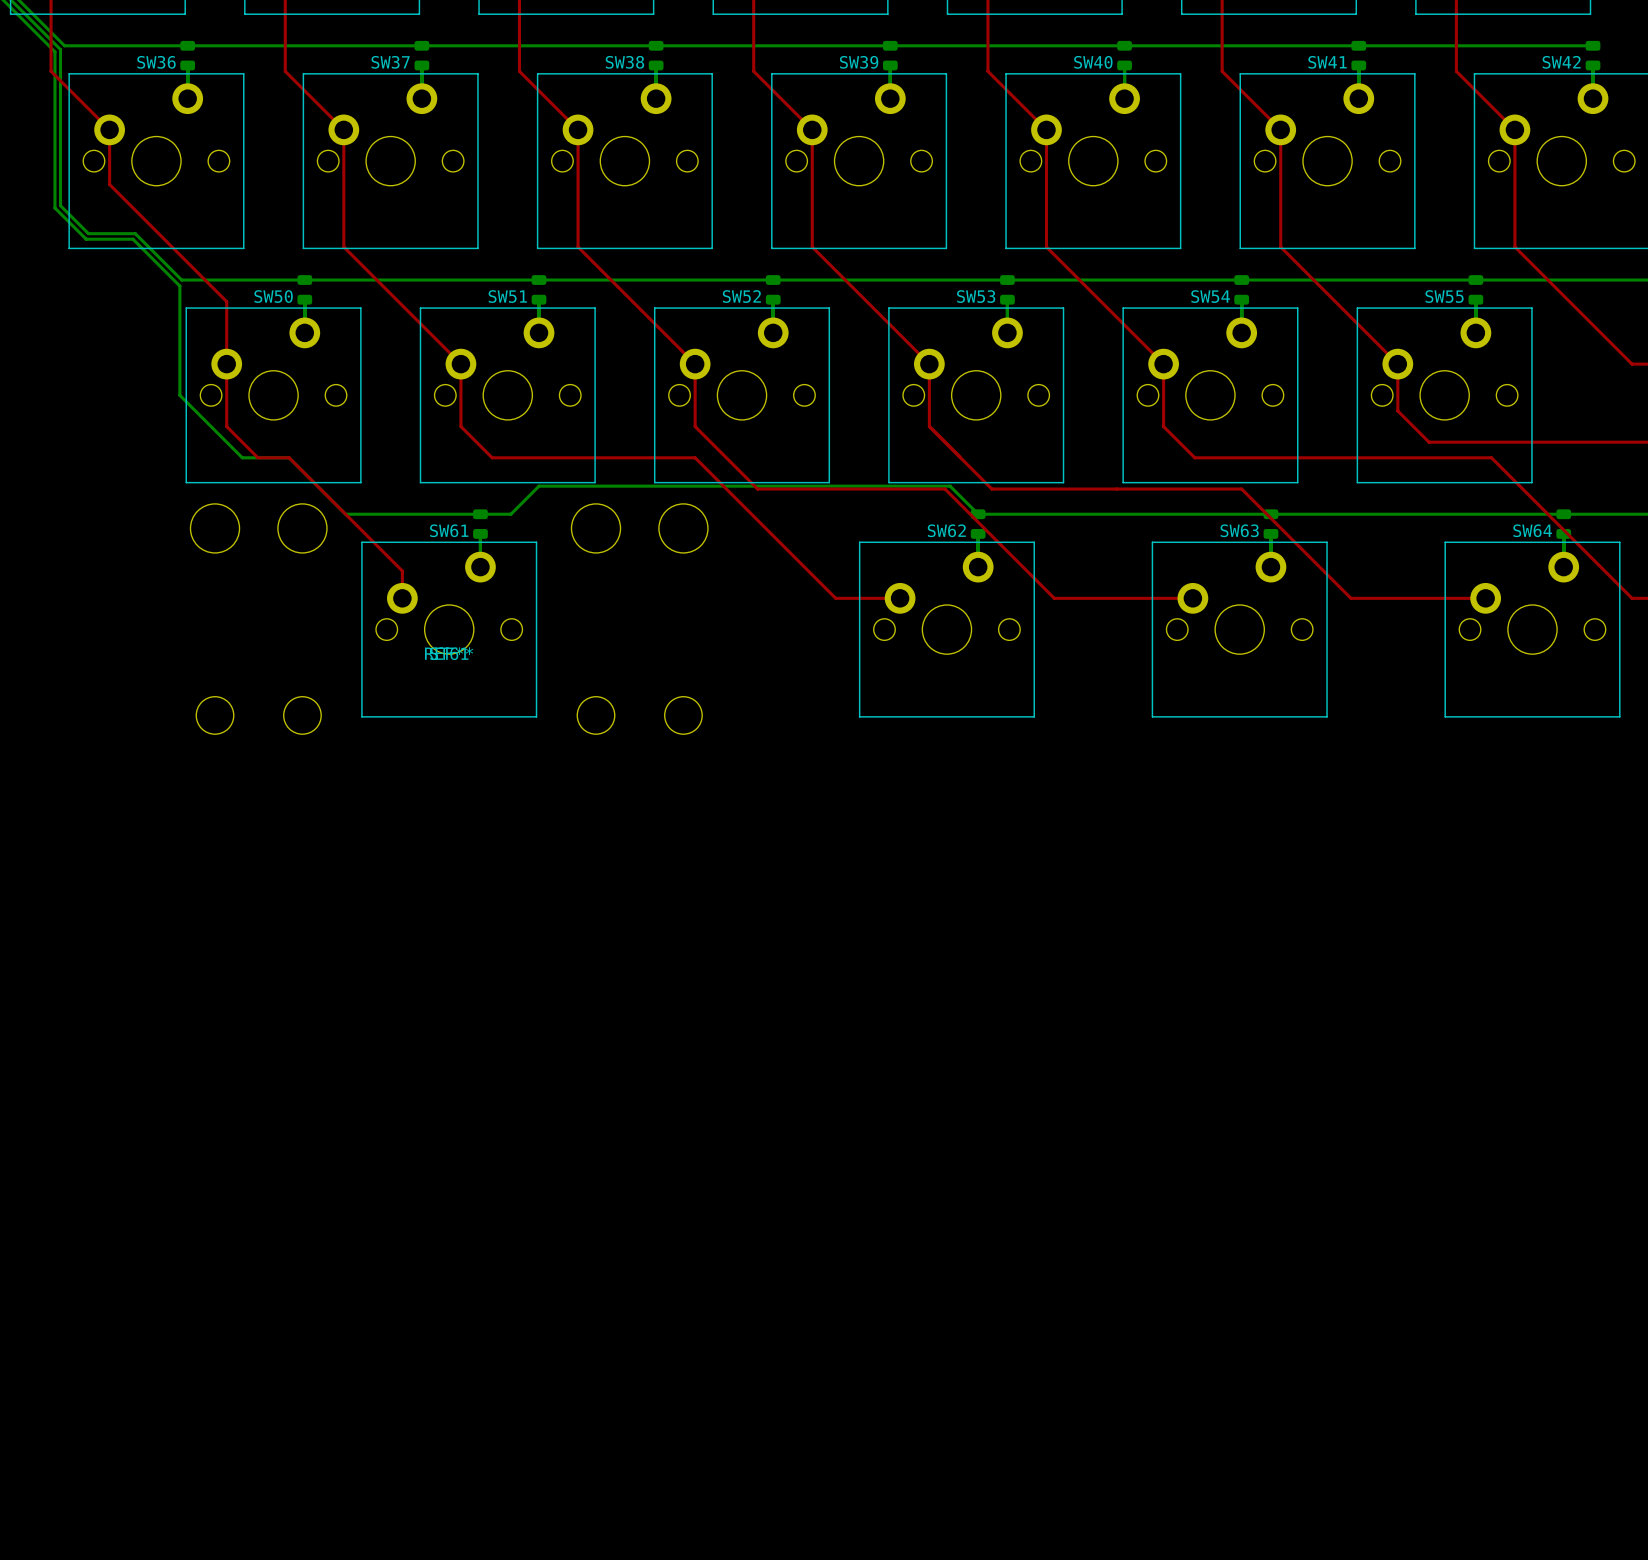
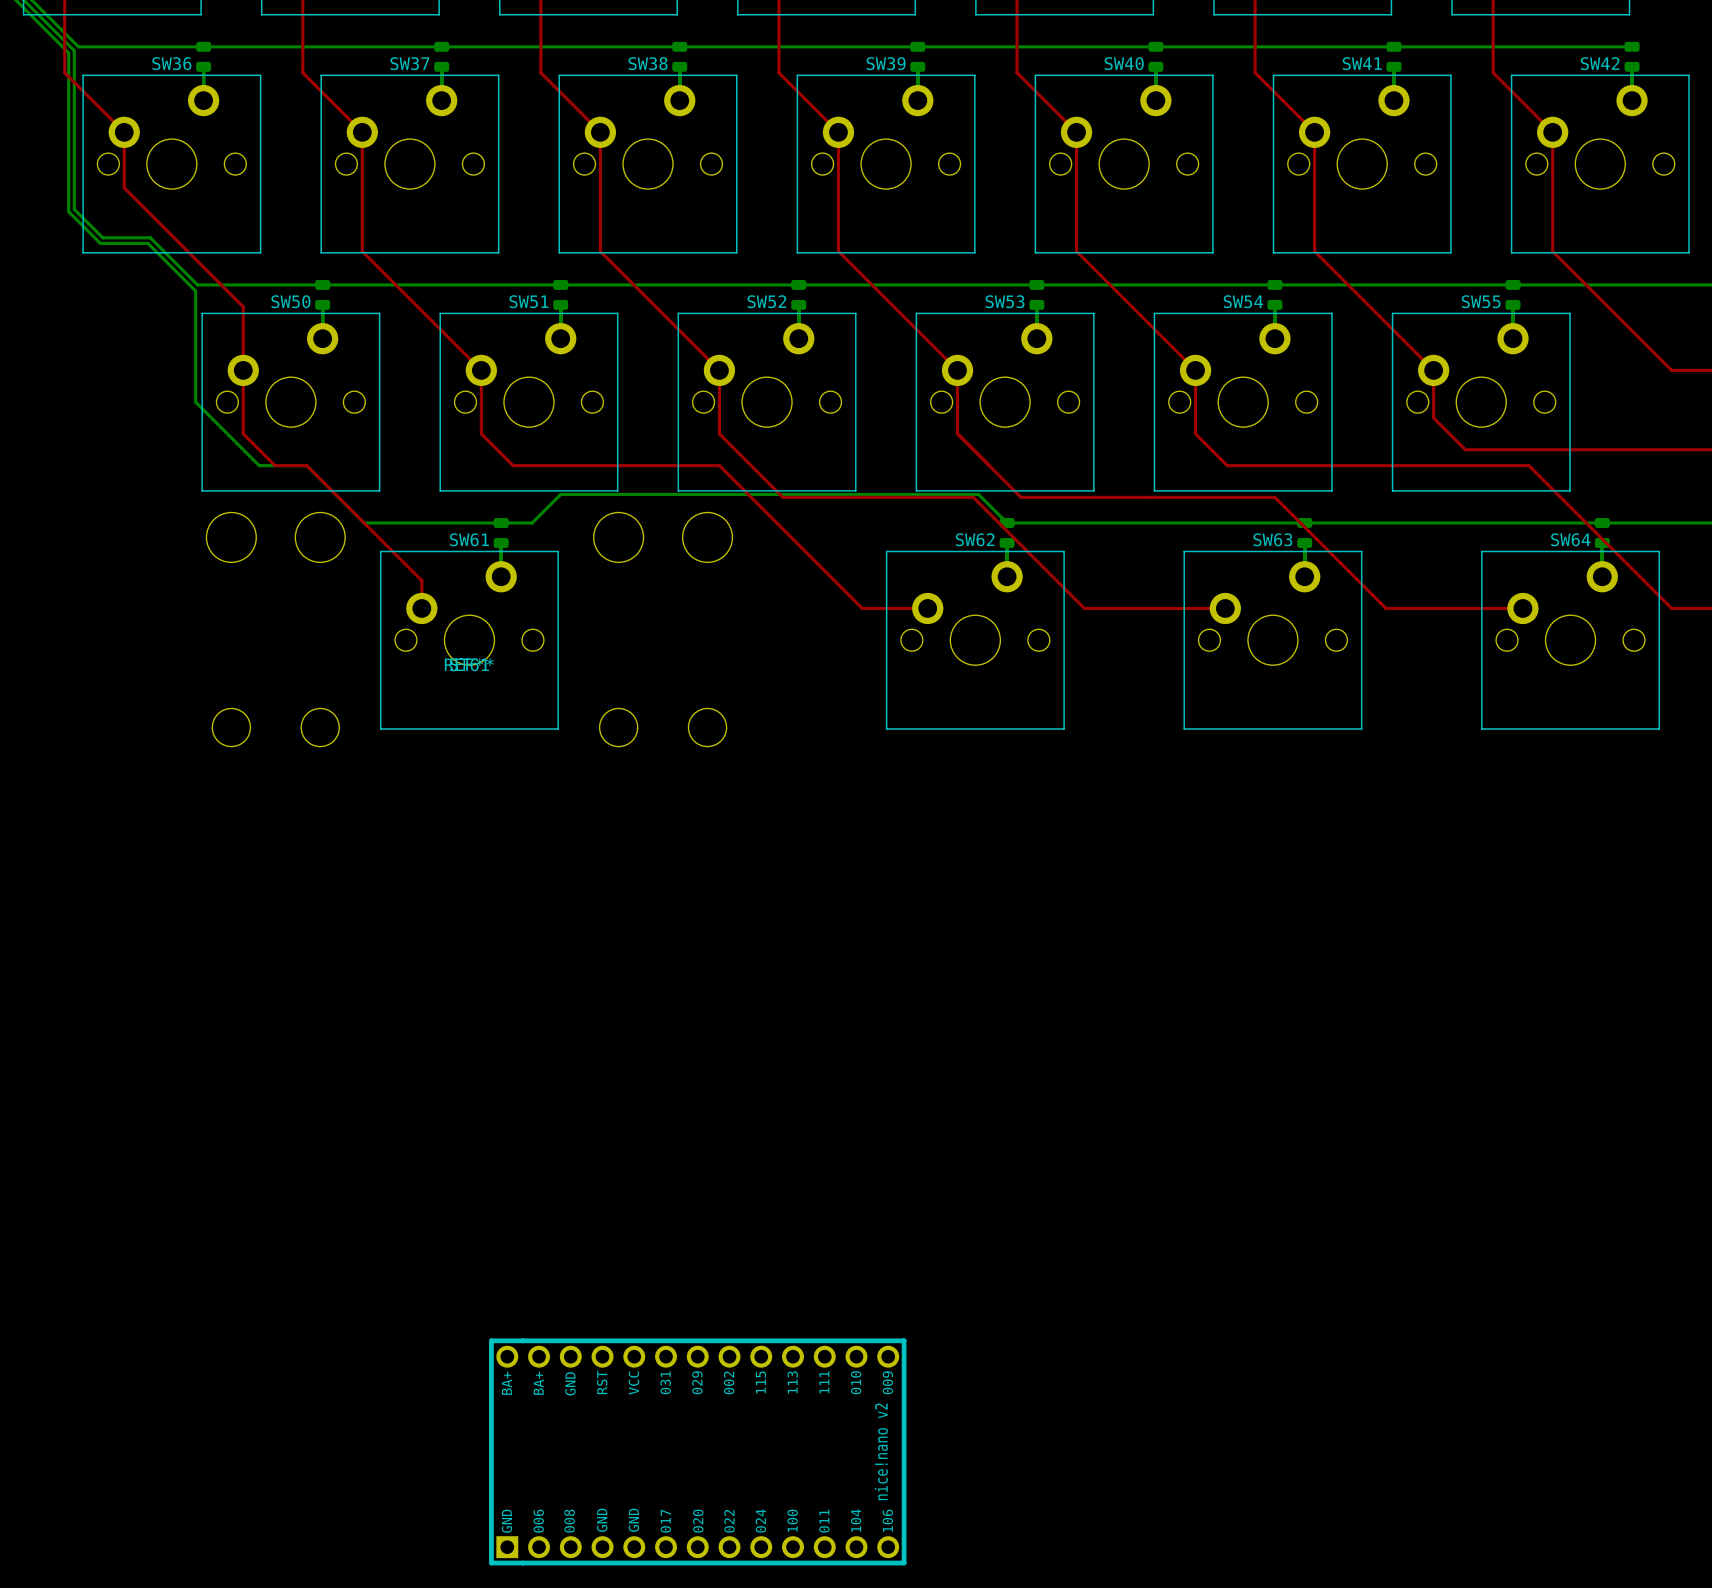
part: none -> (697, 1451)

